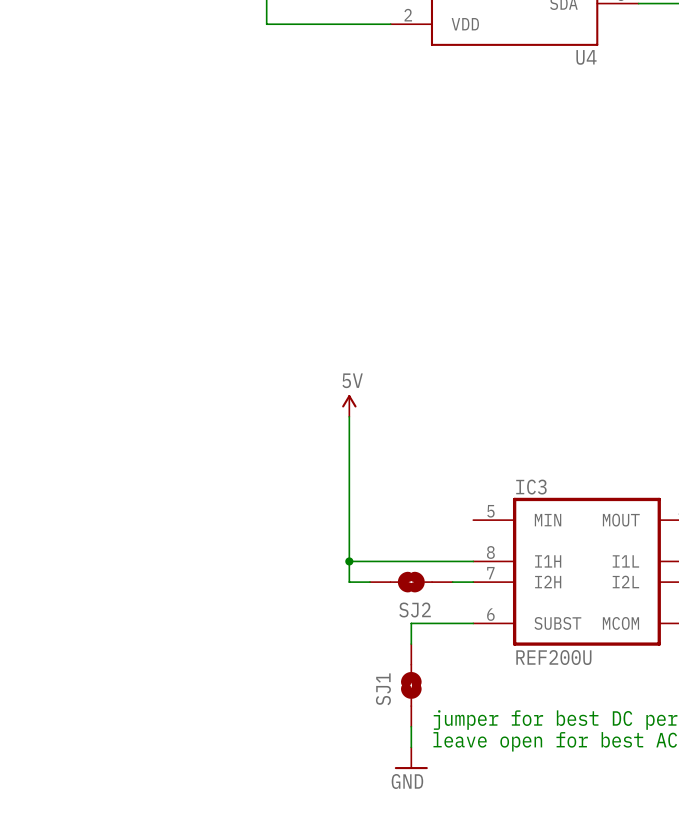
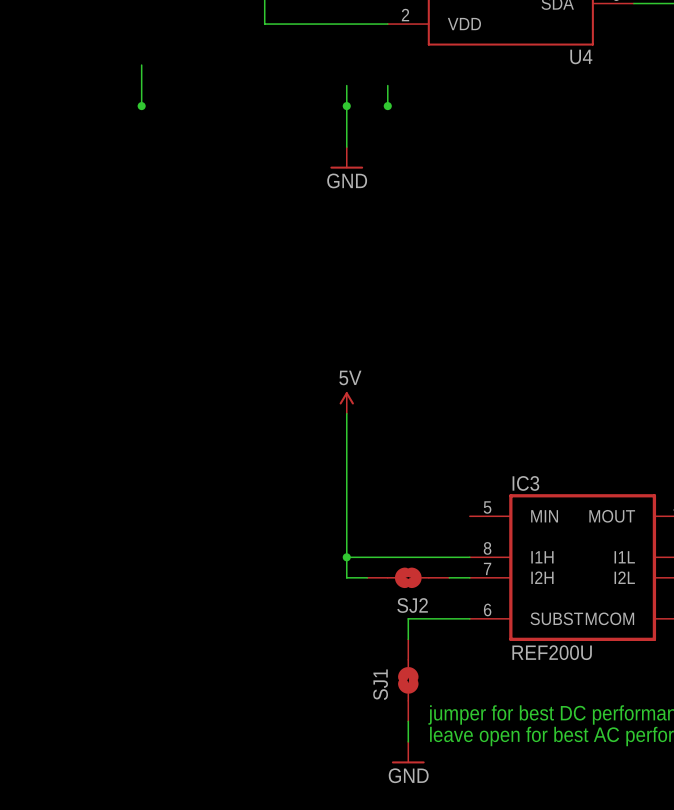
wire: none -> (141, 65) (141, 106)
wire: none -> (346, 85) (346, 147)
wire: none -> (387, 85) (387, 106)
junction: none -> (141, 106)
junction: none -> (346, 106)
junction: none -> (387, 106)
power symbol: none -> GND (346, 157)

